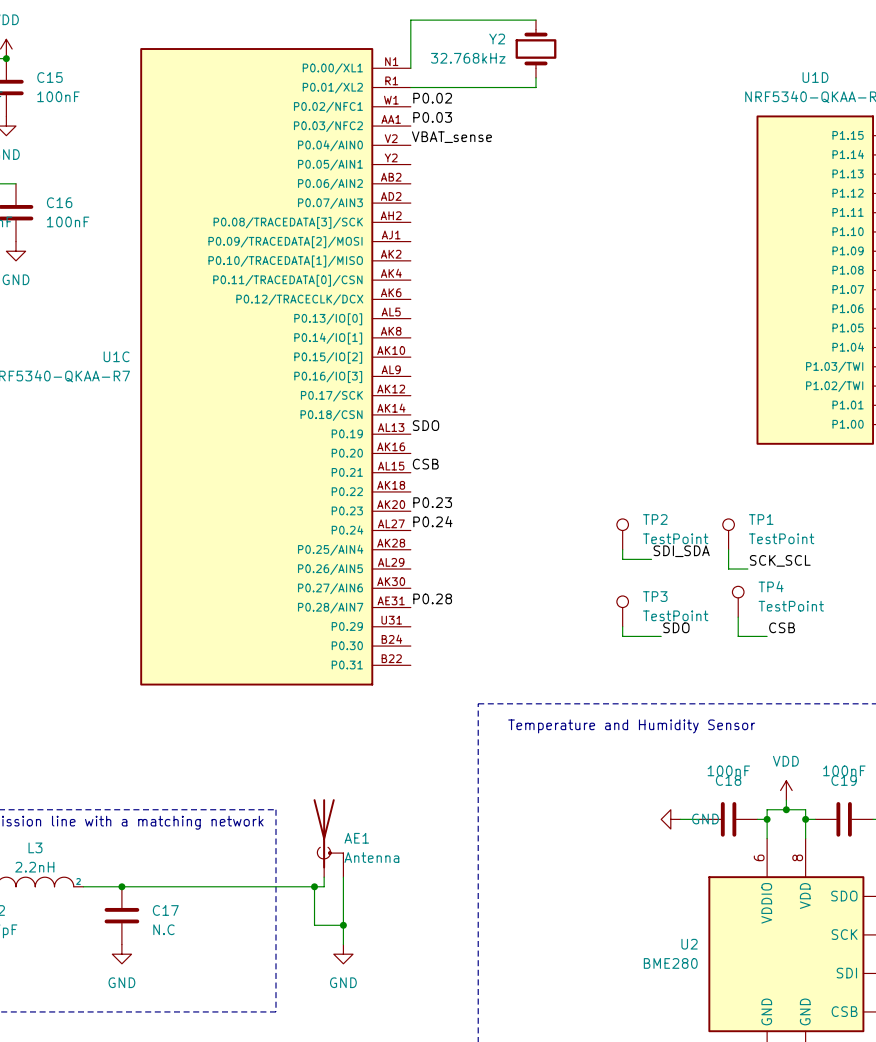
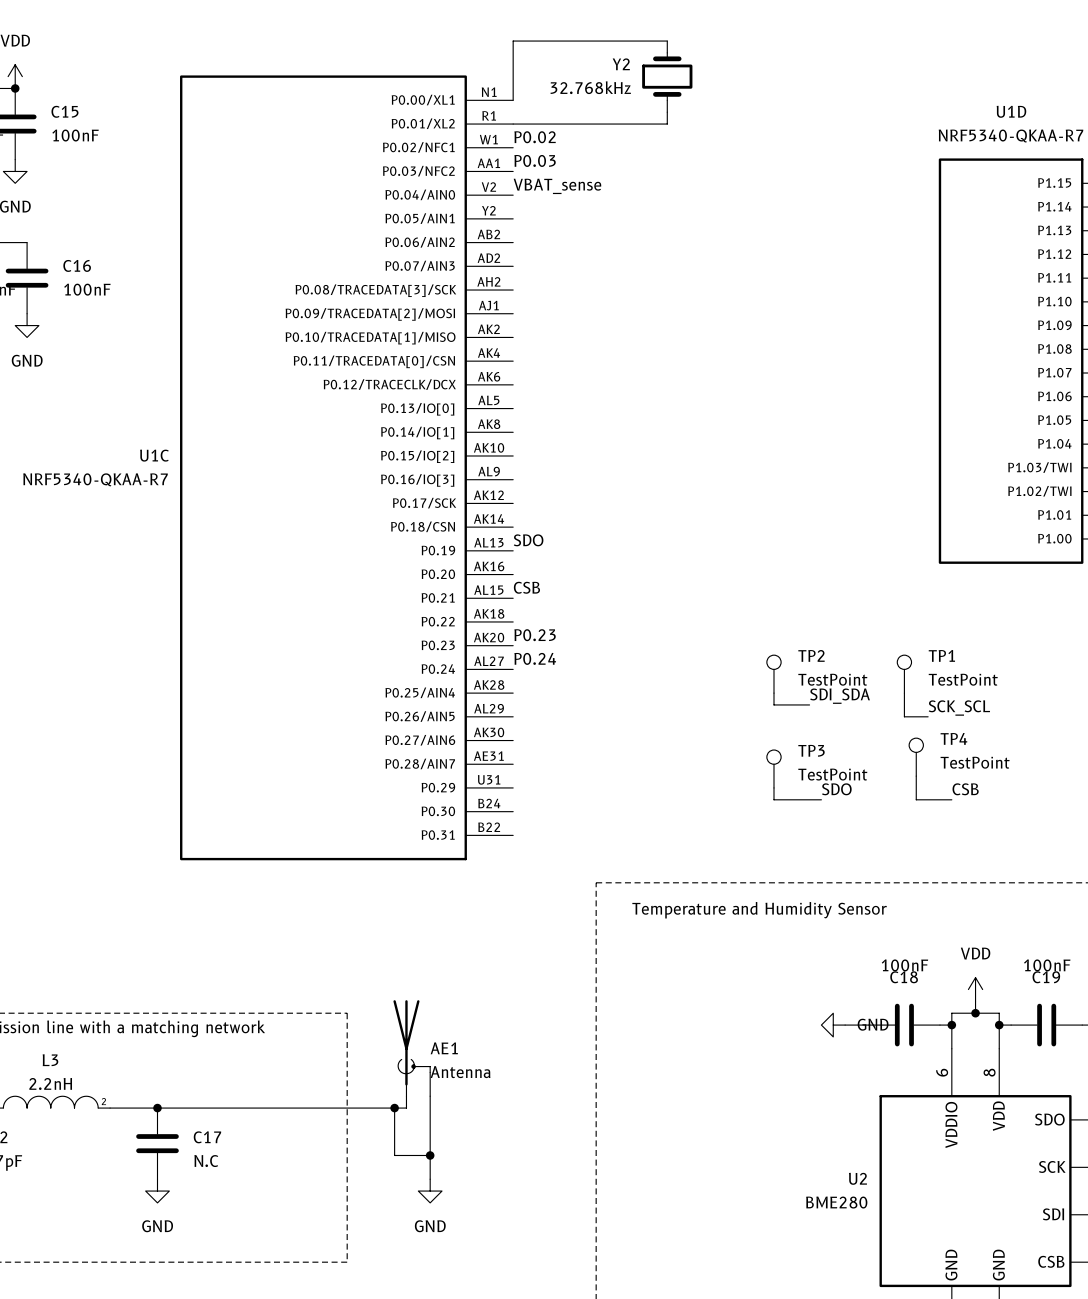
label: P0.28 (432, 598) -> none

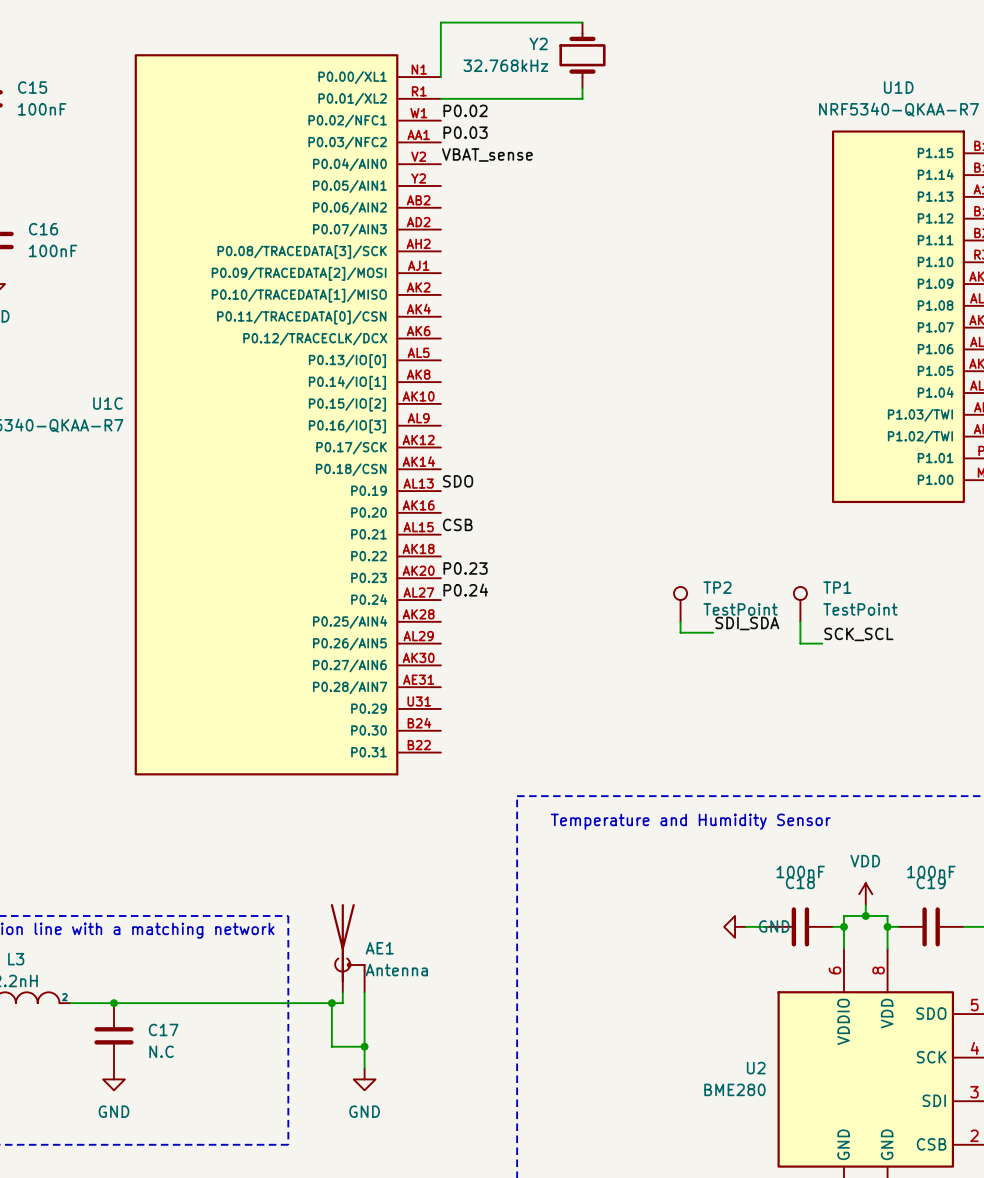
TP4: TestPoint (916, 757) -> none
TP3: TestPoint (773, 768) -> none
wire: (916, 776) (916, 799) (951, 799) -> none
wire: (773, 787) (773, 799) (821, 799) -> none
label: SDO (836, 789) -> none
label: CSB (965, 789) -> none

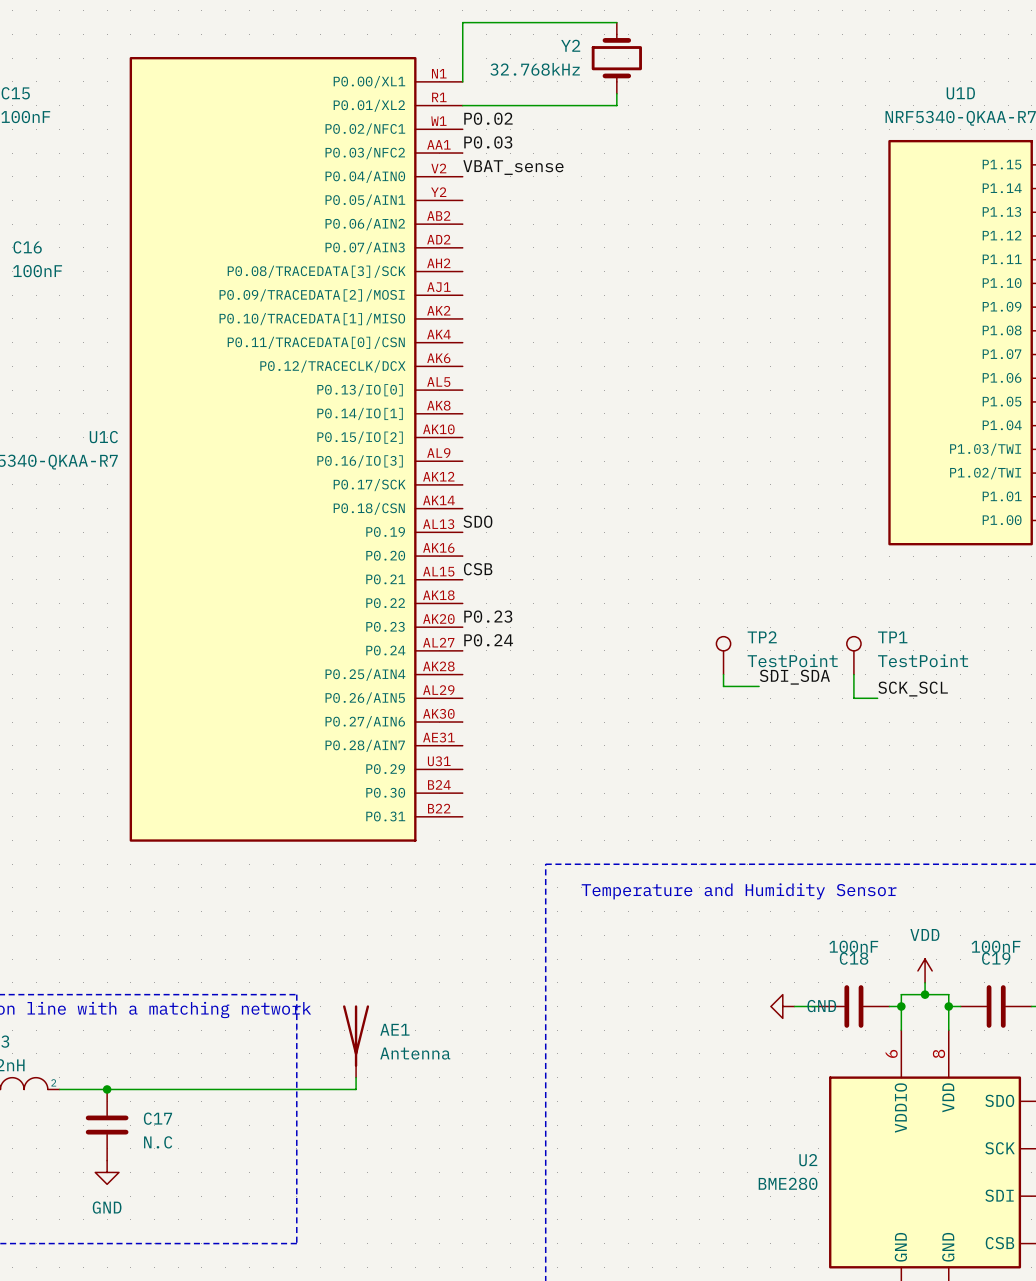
AE1 symbol: [330, 904, 365, 993] -> [343, 1005, 370, 1078]
wire: (364, 992) (364, 1068) -> none
wire: (331, 1003) (331, 1046) (364, 1046) -> none
junction: (331, 1003) -> none
junction: (364, 1046) -> none
power symbol: GND (364, 1079) -> none

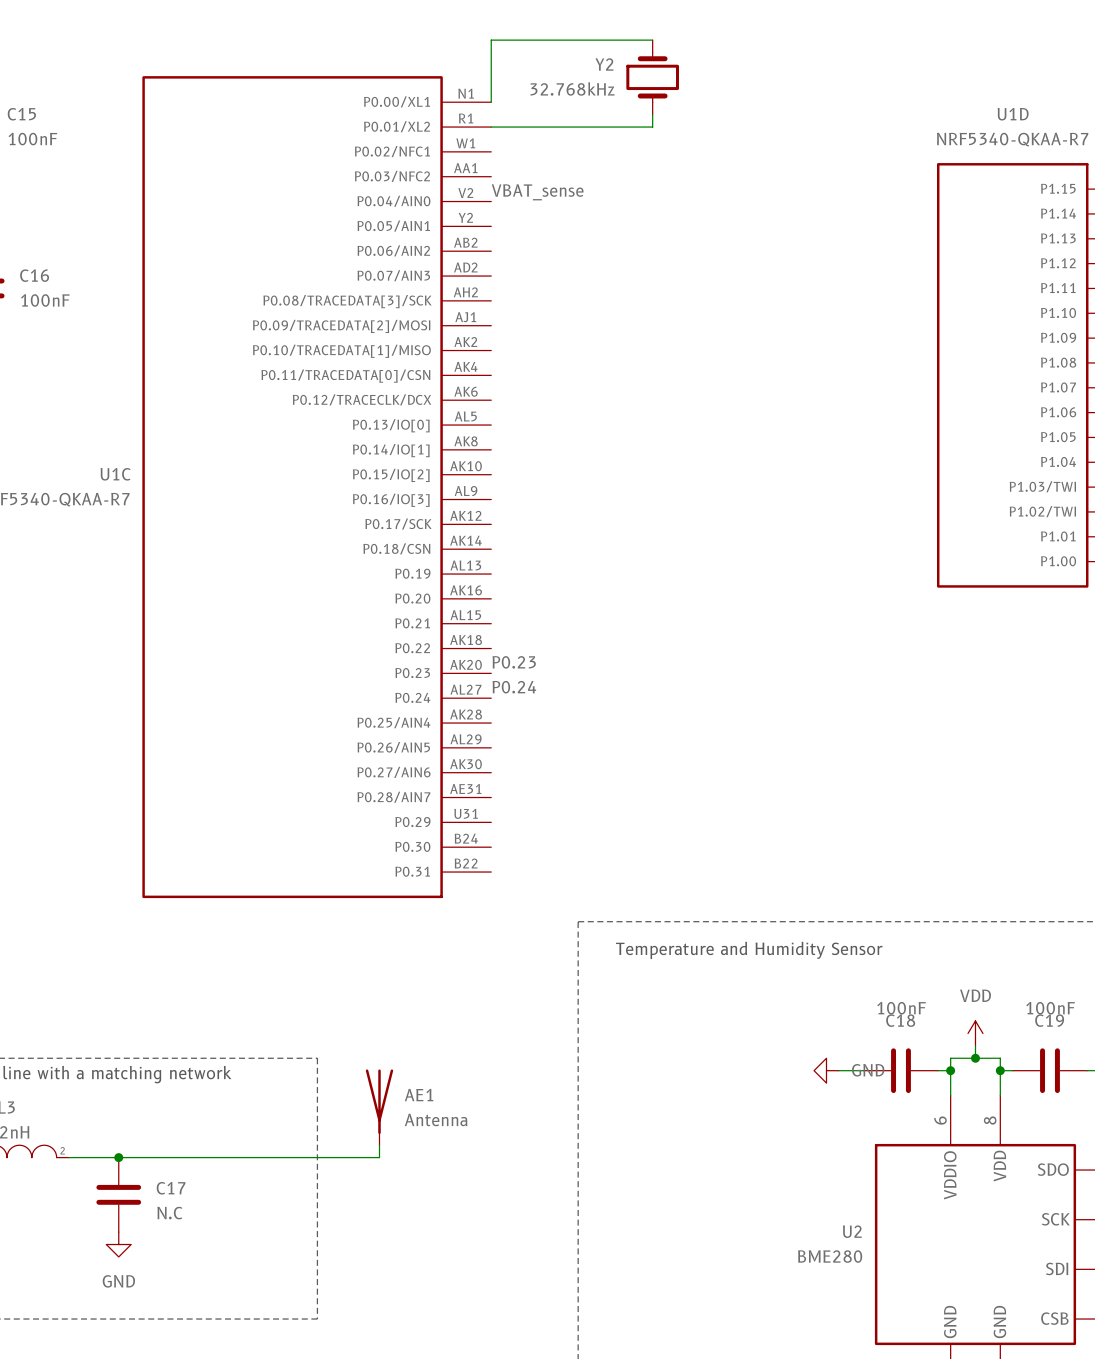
label: P0.02 (488, 118) -> none
label: P0.03 (488, 142) -> none
label: SDO (477, 521) -> none
label: CSB (478, 569) -> none
TP2: TestPoint (723, 655) -> none
TP1: TestPoint (853, 655) -> none
wire: (723, 674) (723, 686) (759, 686) -> none
wire: (853, 674) (853, 698) (877, 698) -> none
label: SDI_SDA (794, 677) -> none
label: SCK_SCL (913, 689) -> none

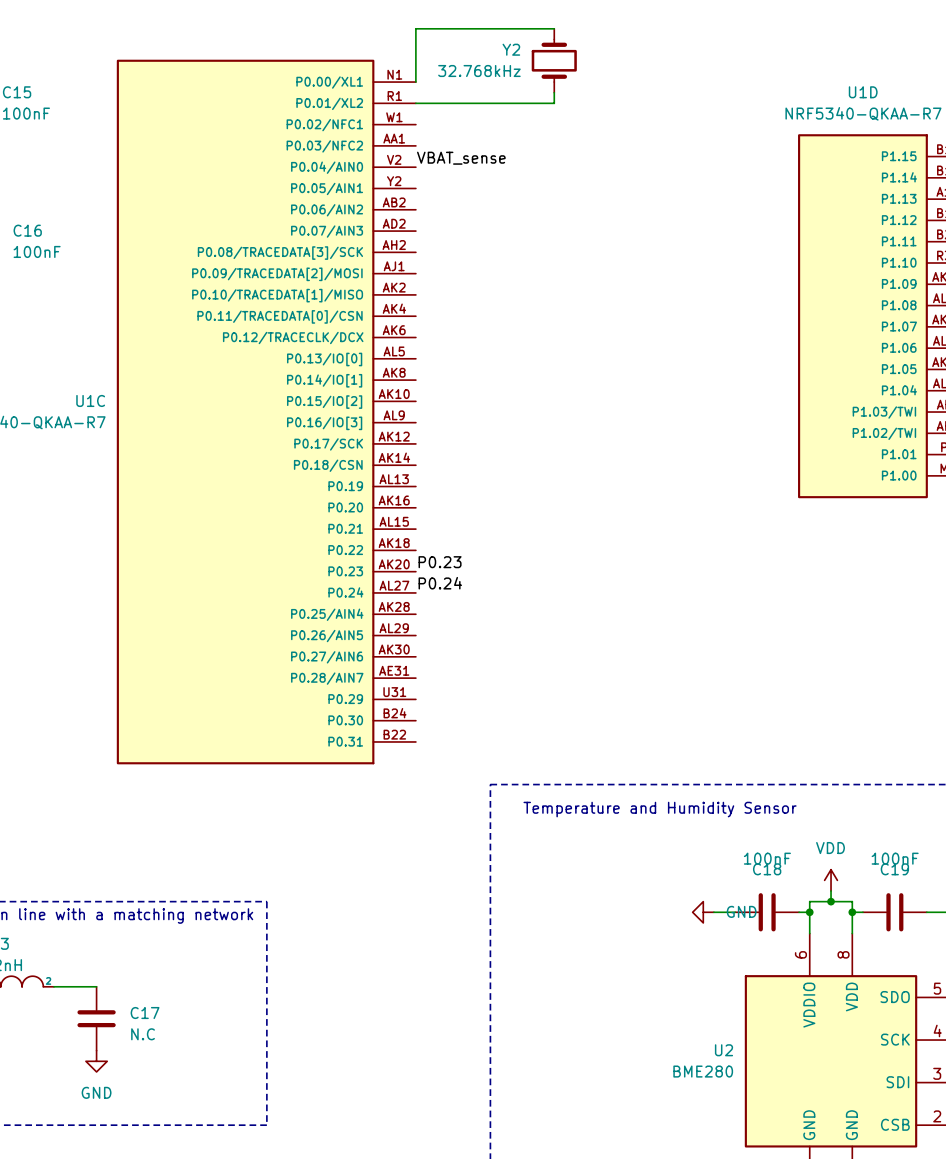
AE1: Antenna (379, 1107) -> none
wire: (379, 1145) (379, 1157) (118, 1157) -> none
junction: (118, 1157) -> none

